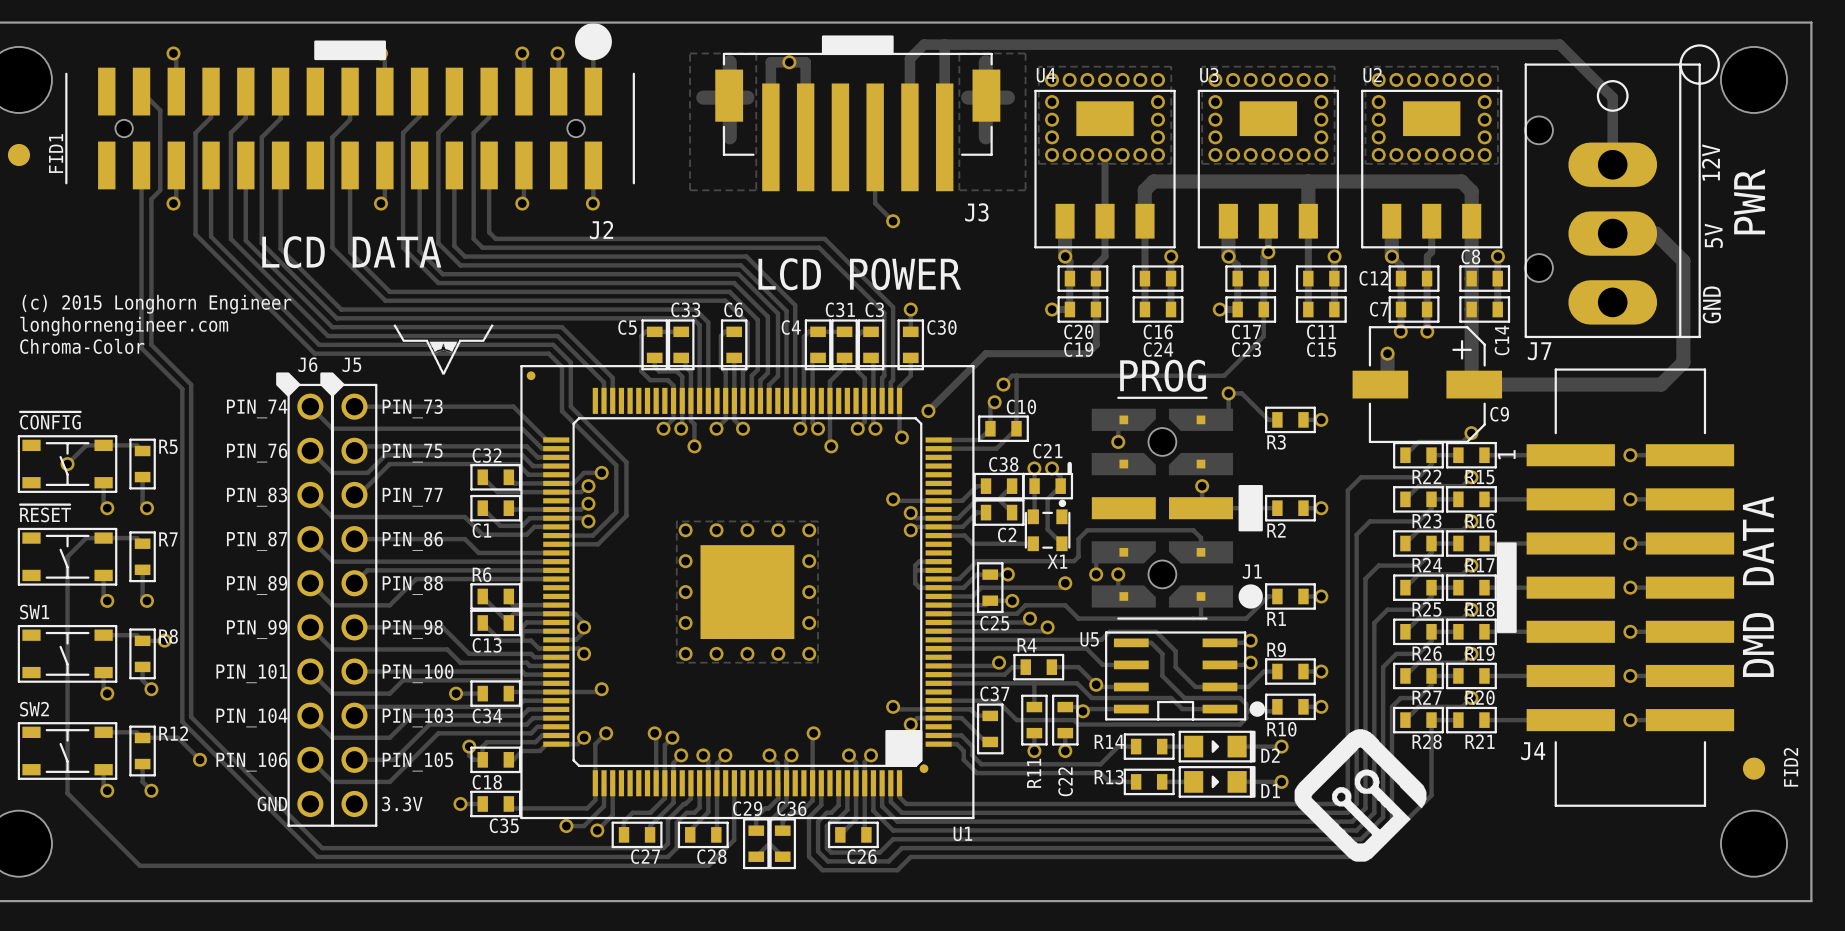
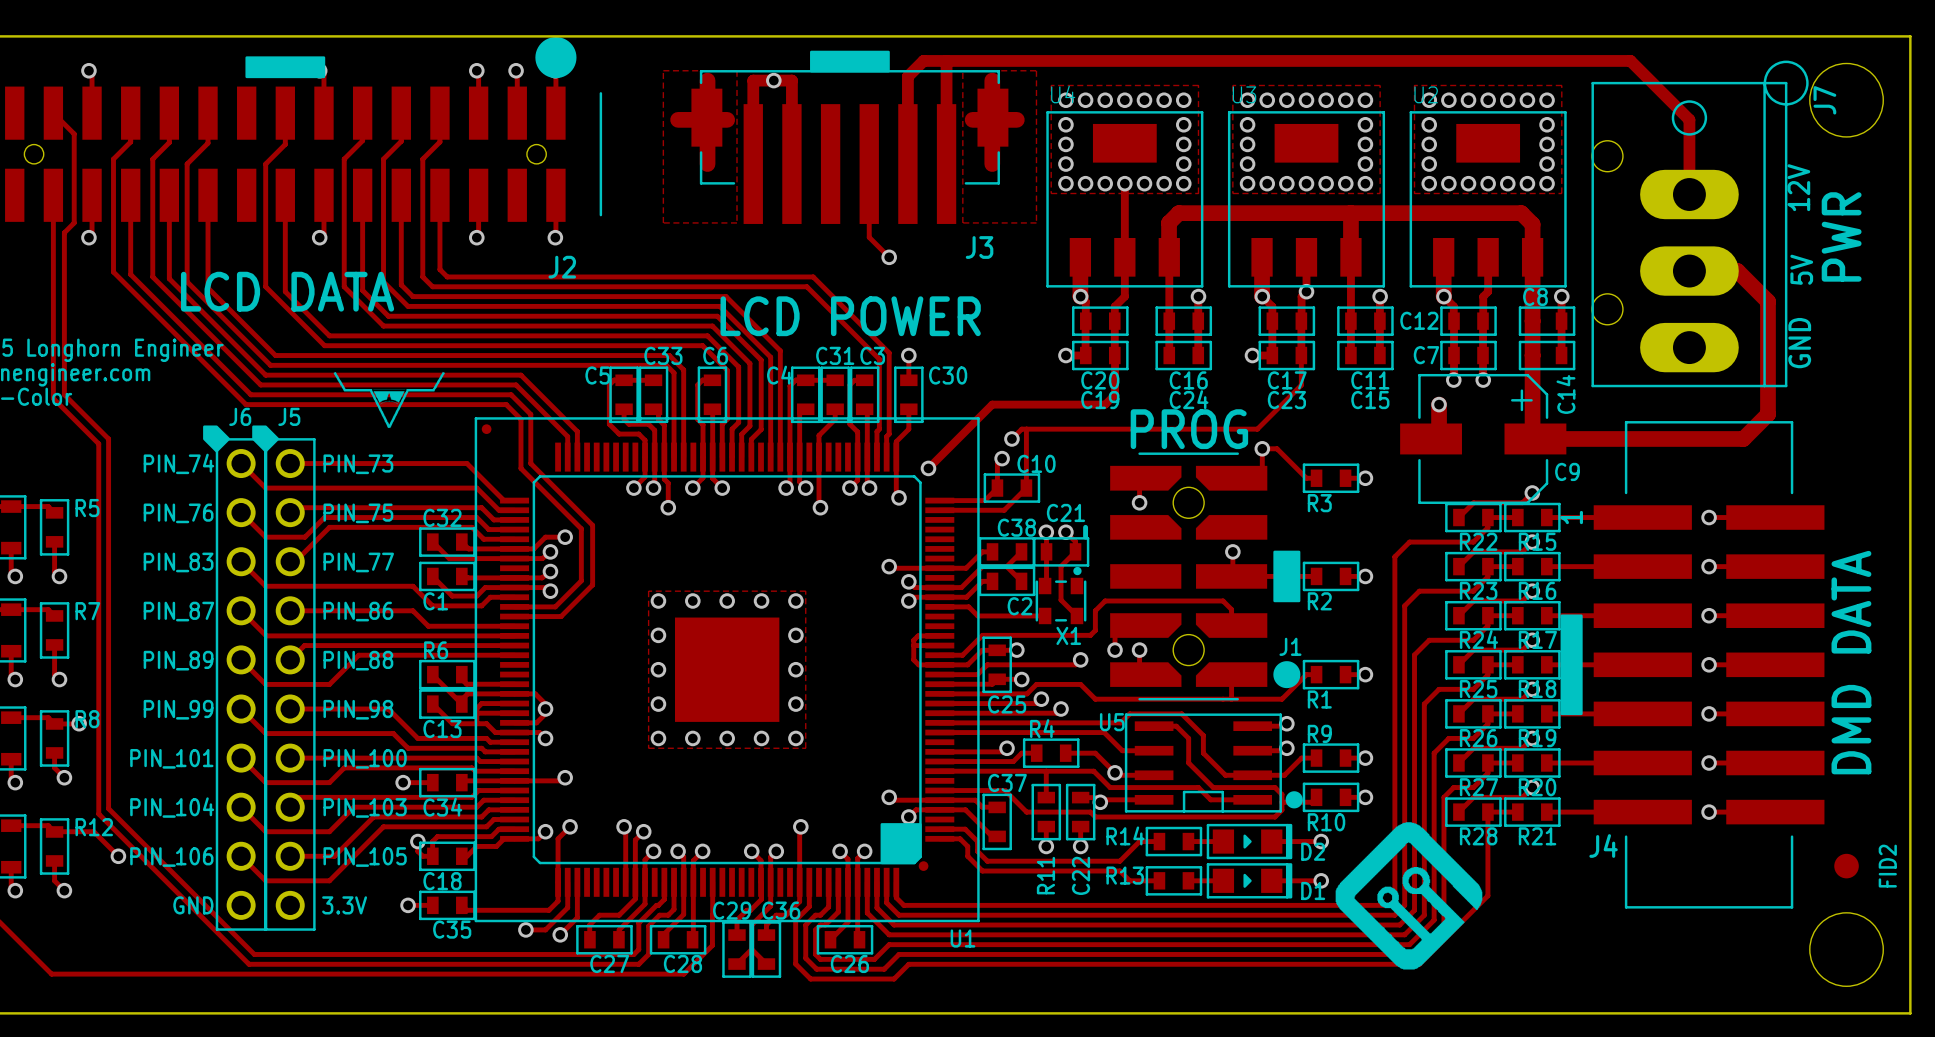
J7 name rotation: 0° (1539, 351) -> 90° counterclockwise (1824, 100)
J7 name position: J7 (1539, 351) -> J7 (1824, 100)

